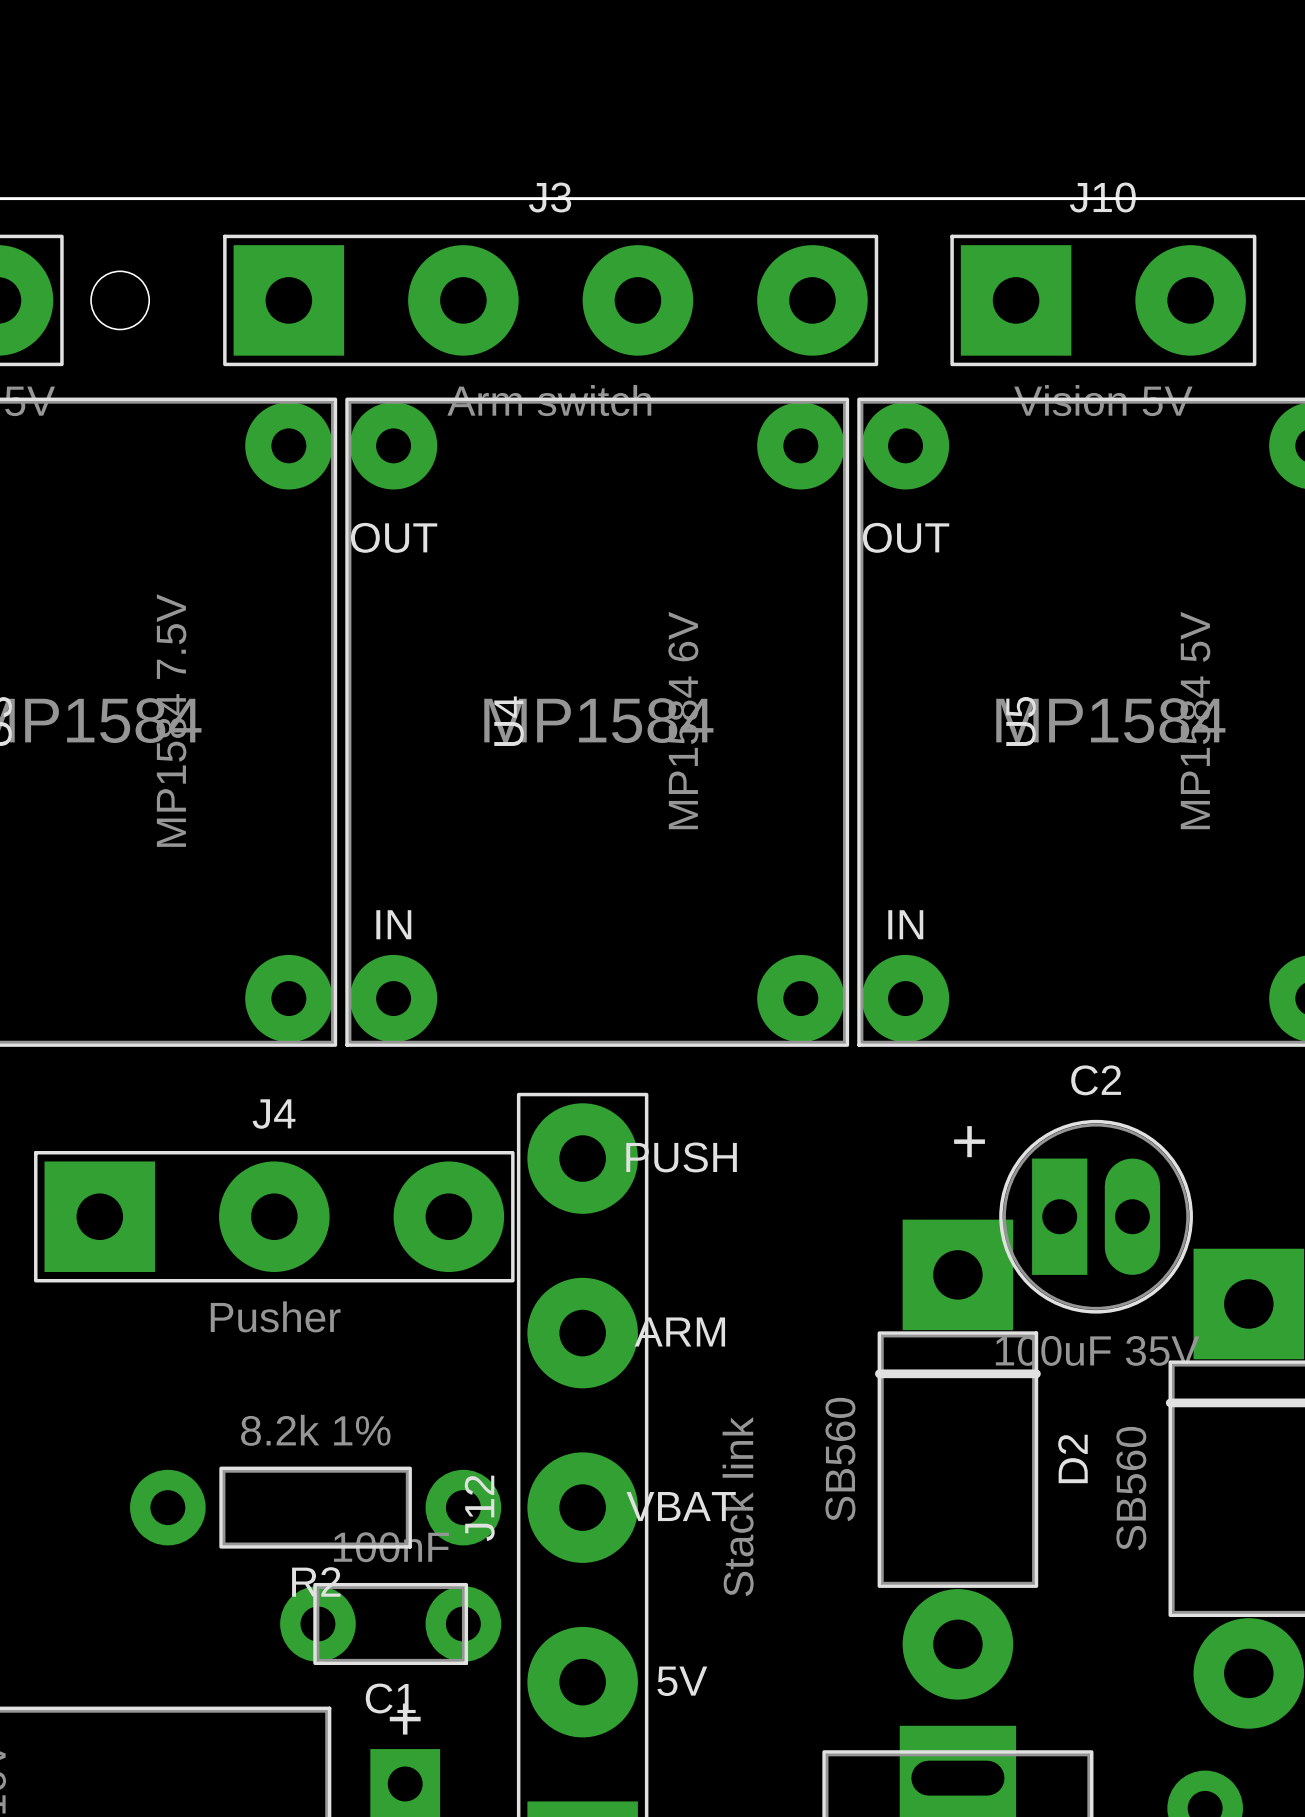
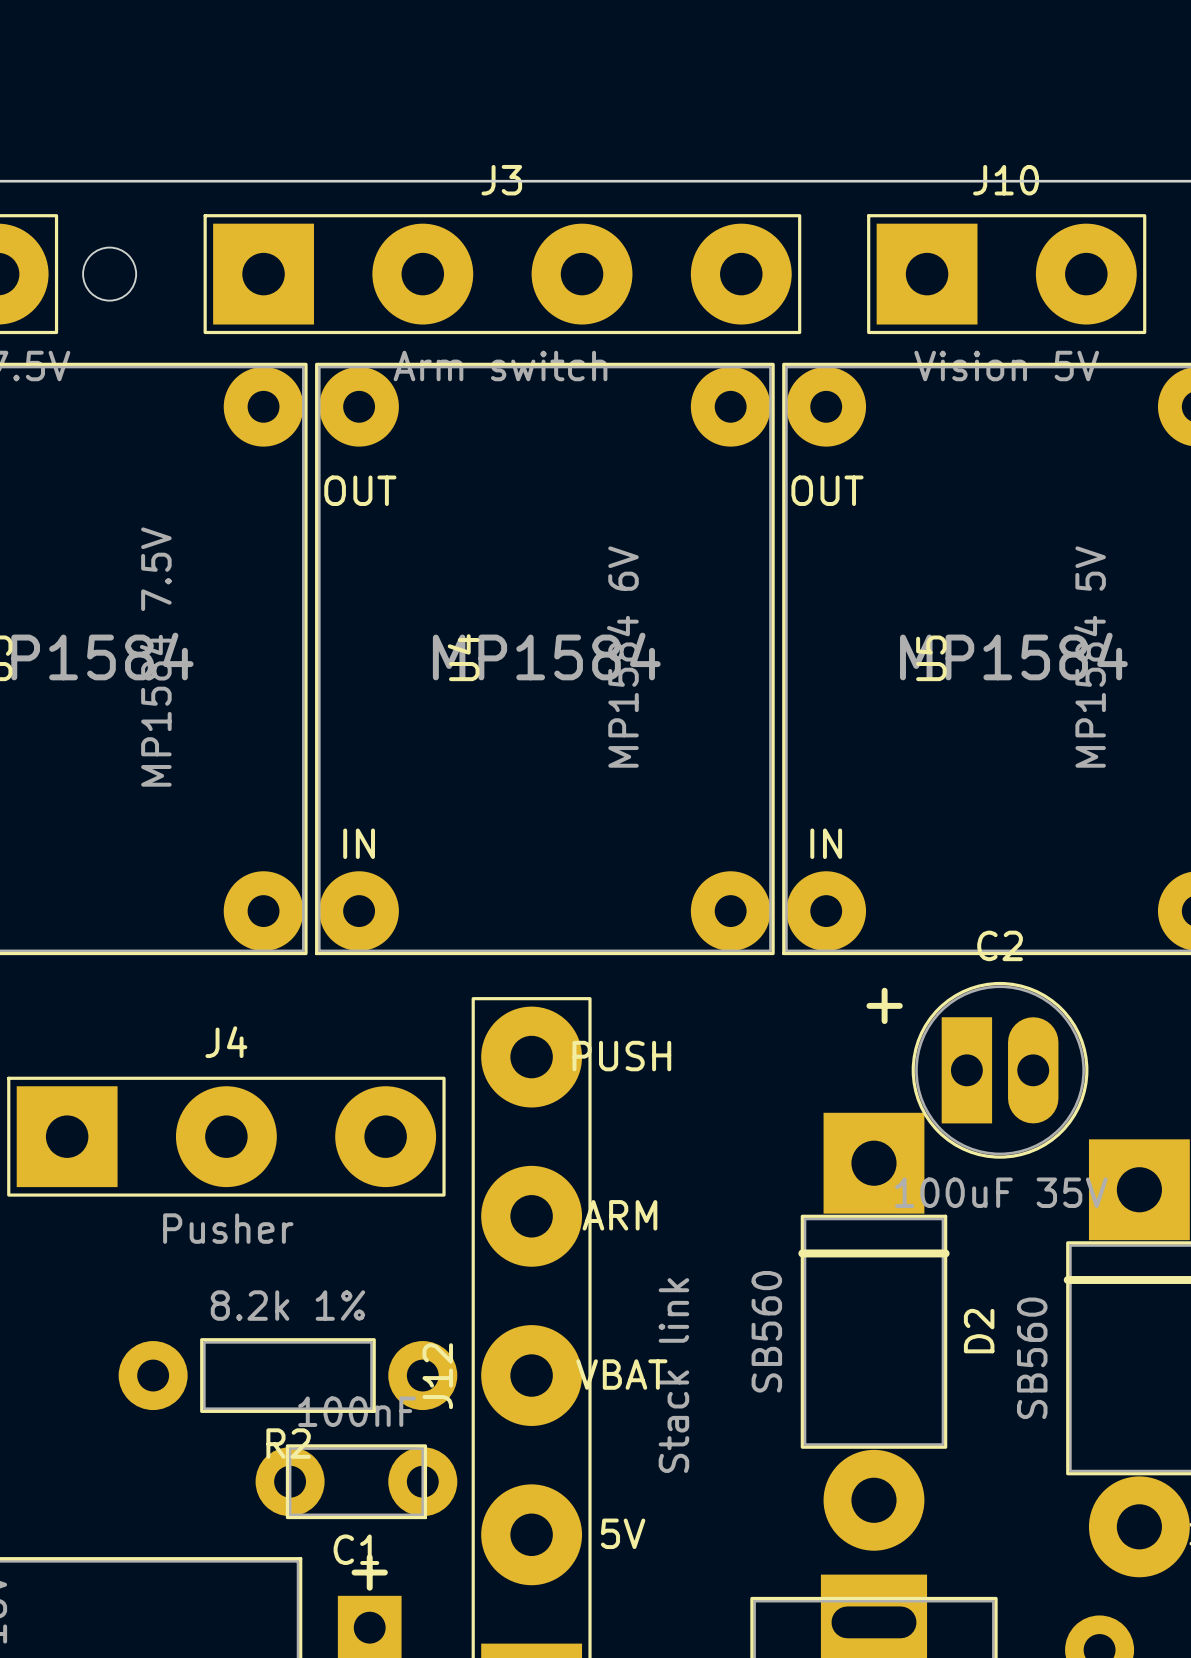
J4 position: (274, 1216) -> (226, 1136)
C2 position: (1096, 1216) -> (1000, 1070)

